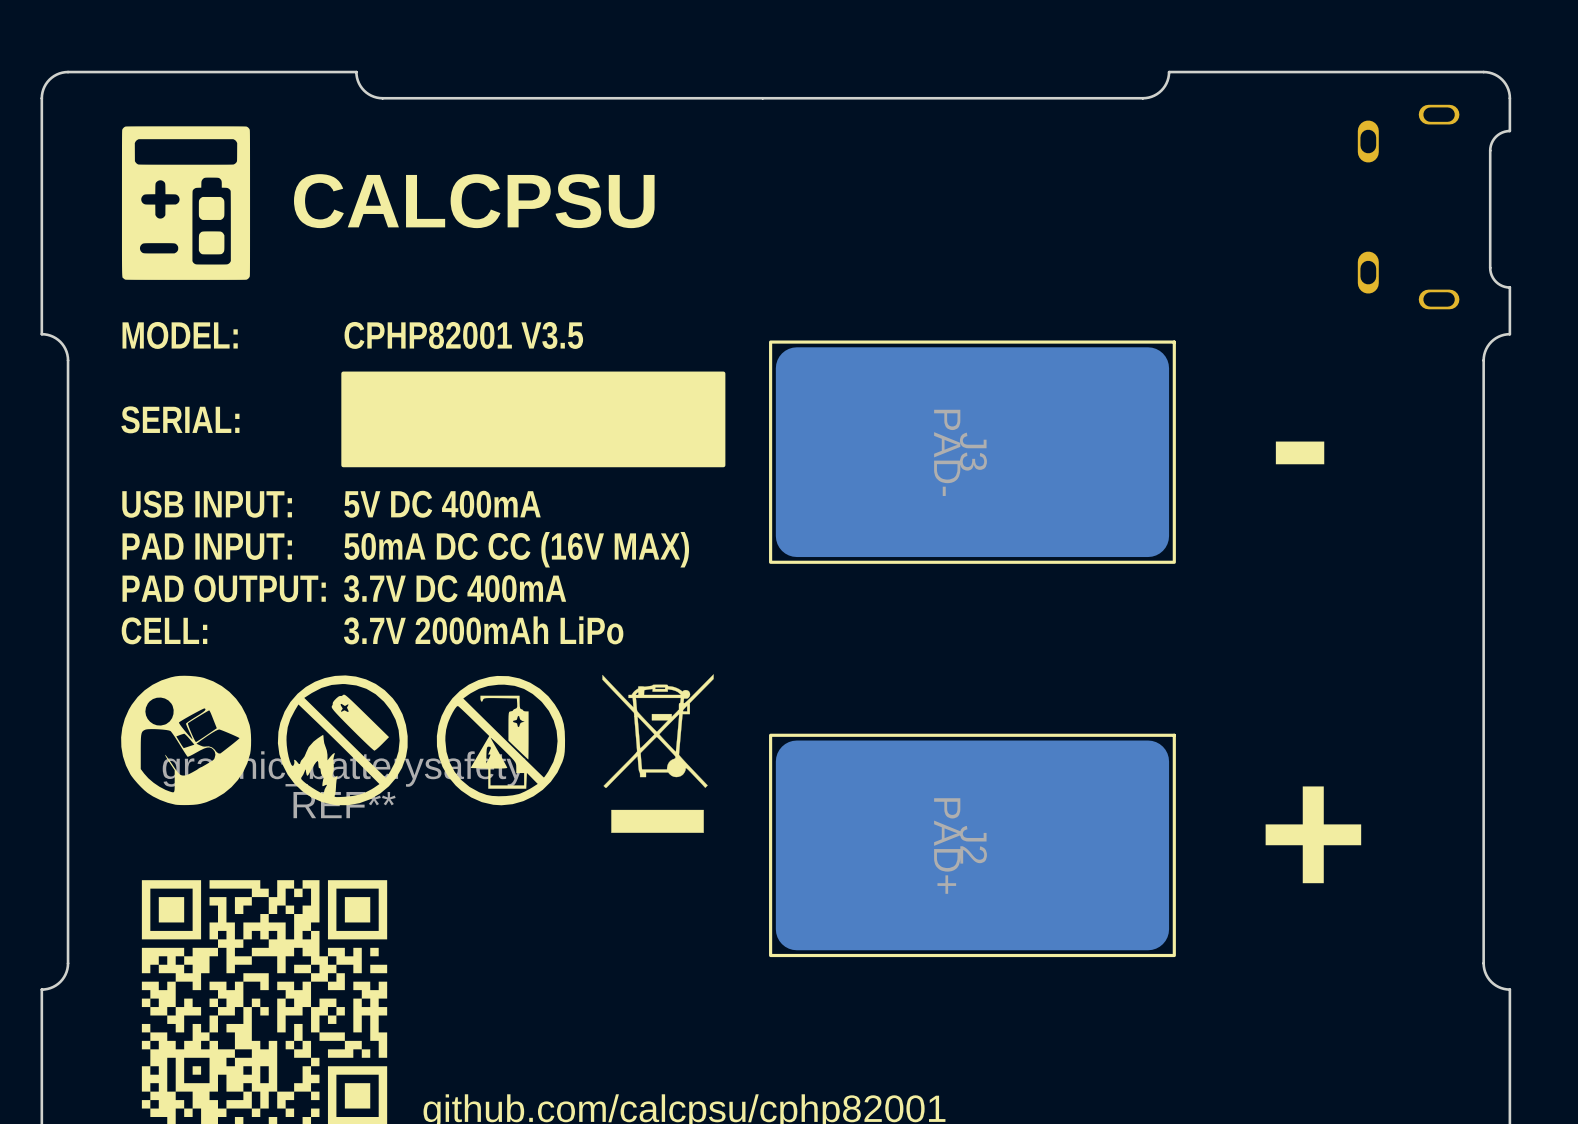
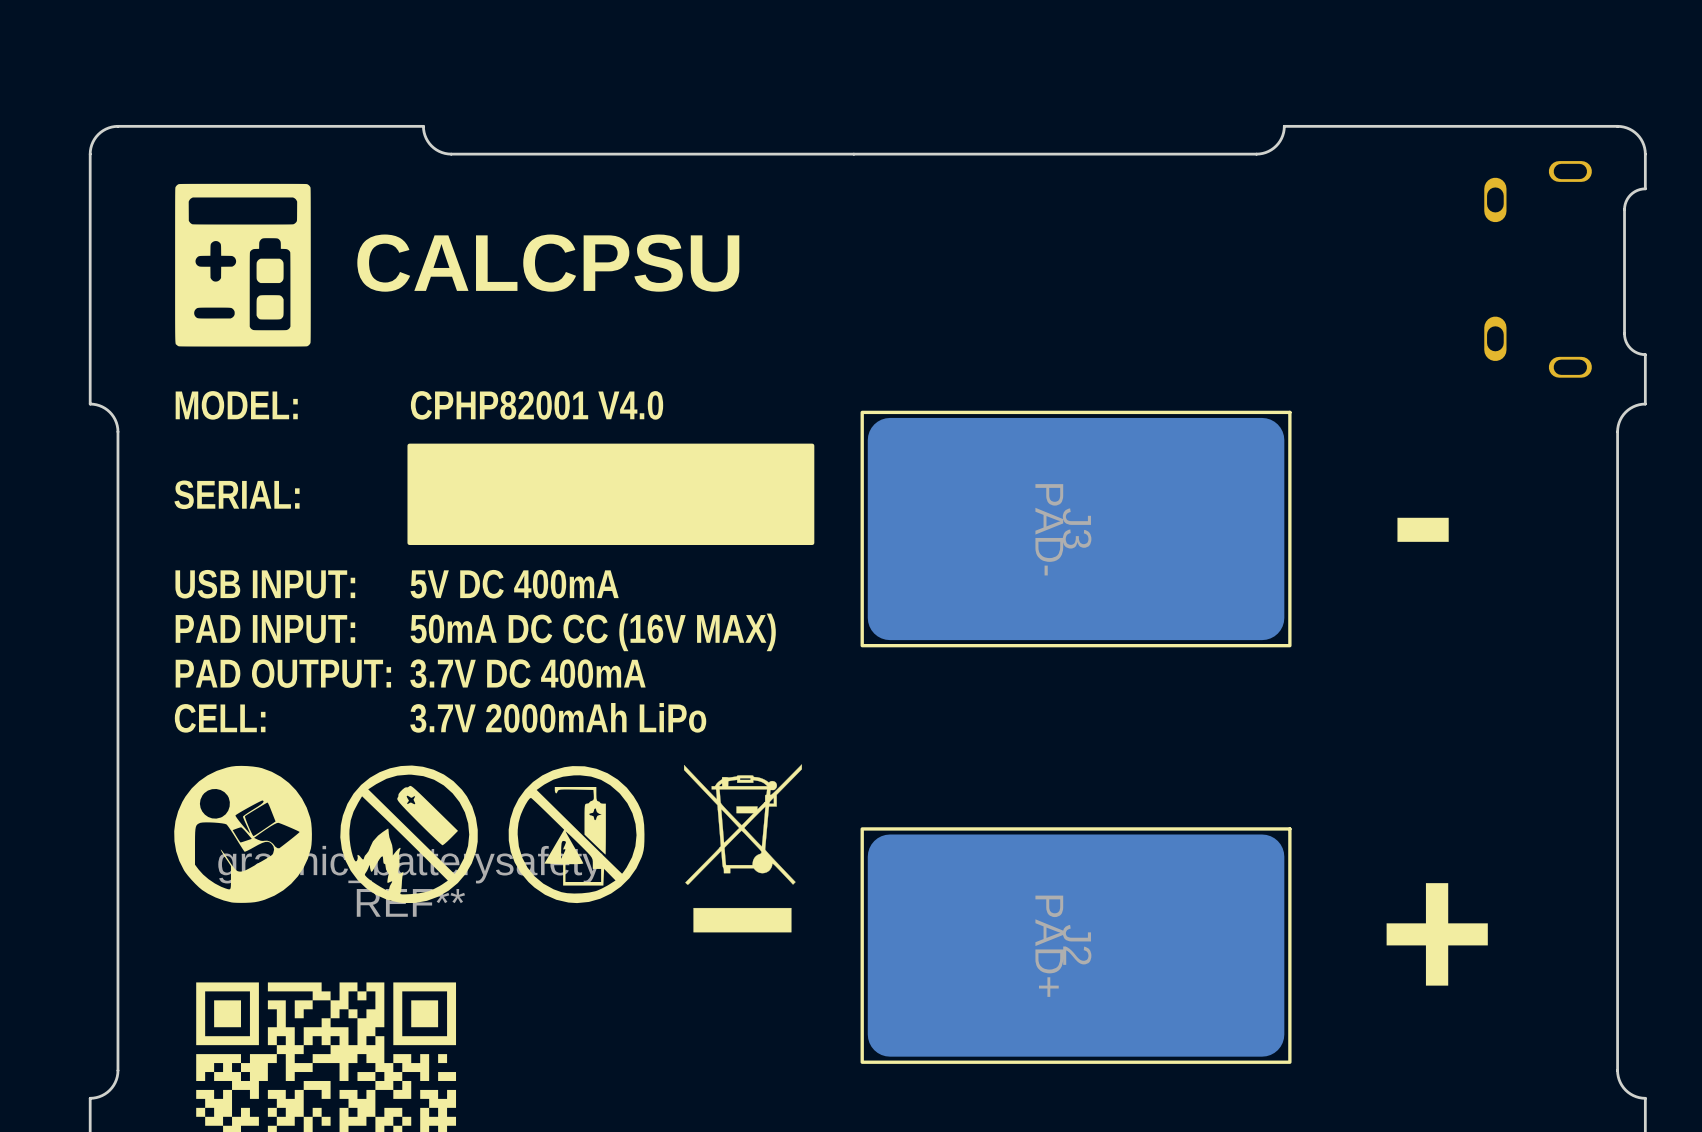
text: CPHP82001 V3.5 (463, 335) -> CPHP82001 V4.0 (537, 405)

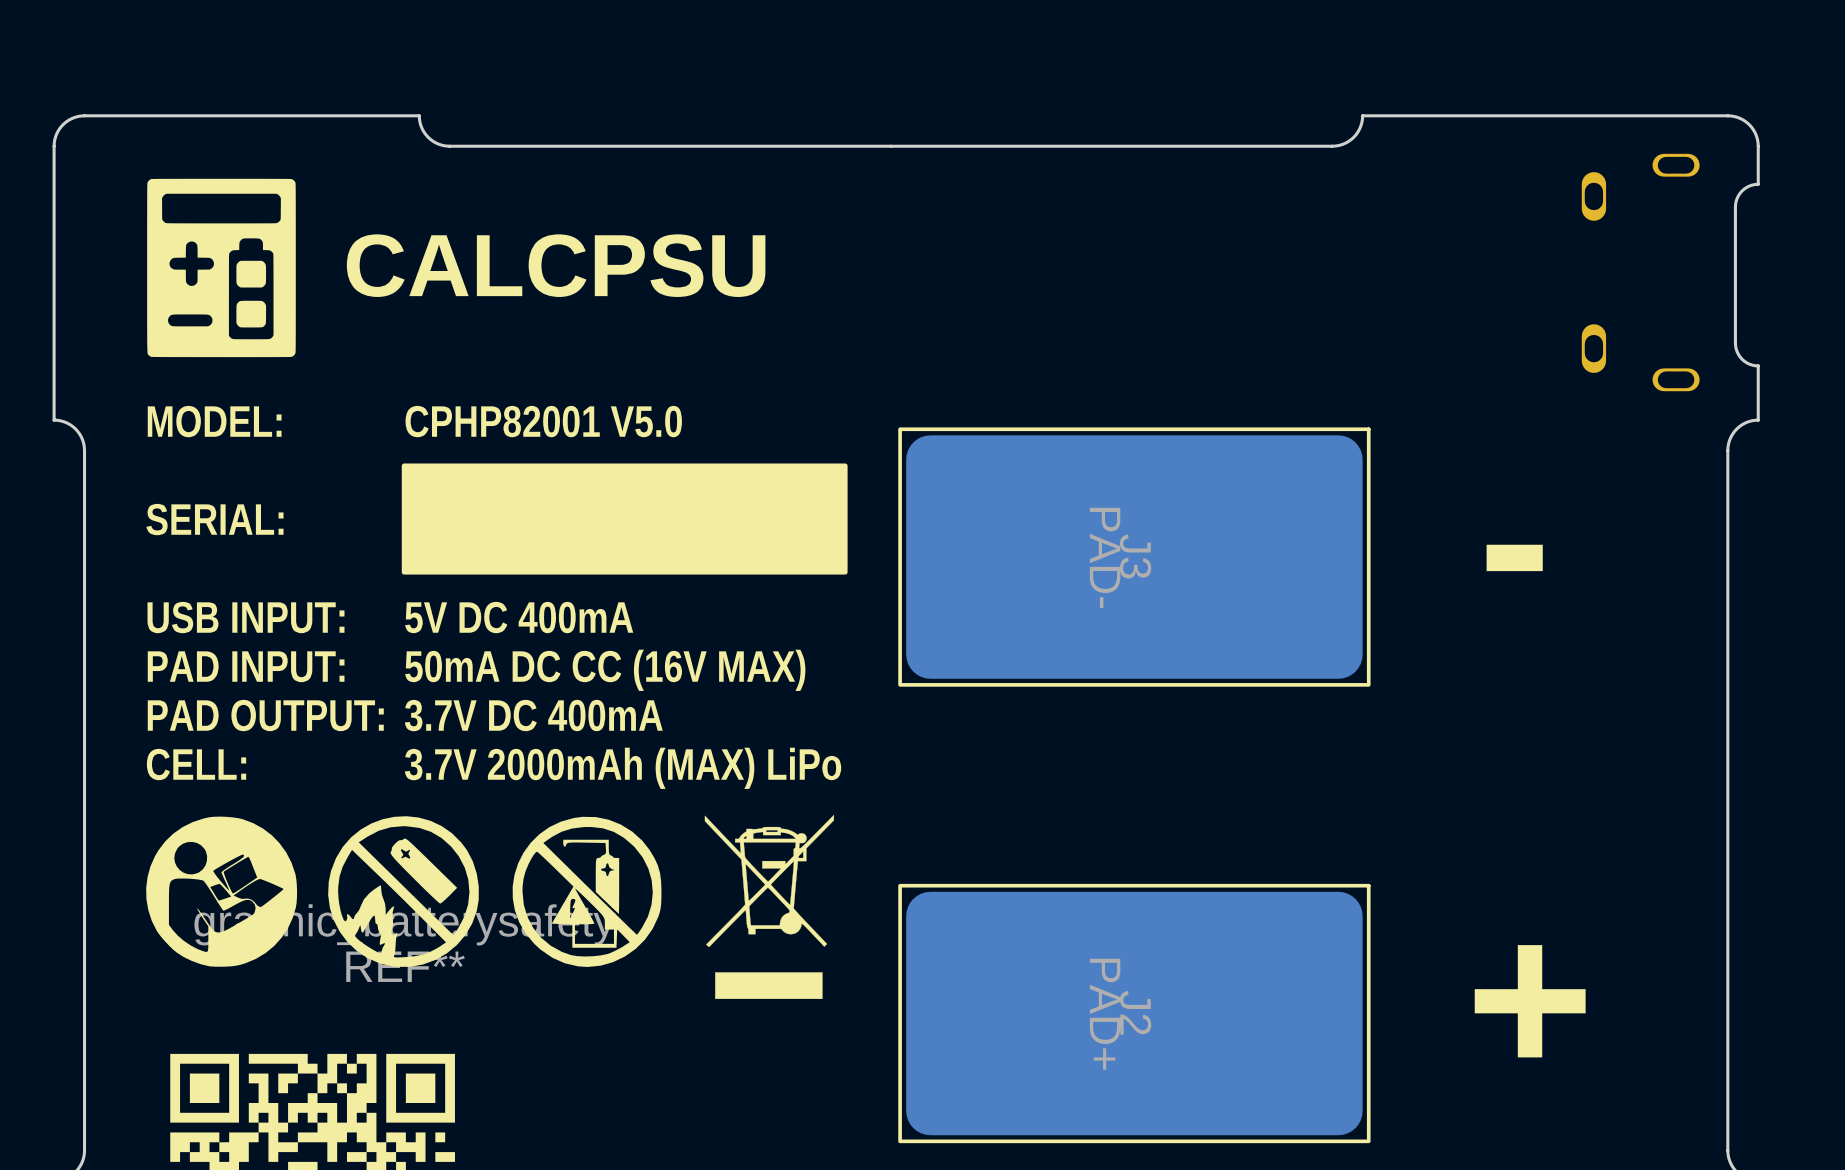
text: CPHP82001 V4.0 (537, 405) -> CPHP82001 V5.0 (543, 421)
text: 3.7V 2000mAh LiPo (558, 717) -> 3.7V 2000mAh (MAX) LiPo (623, 768)

